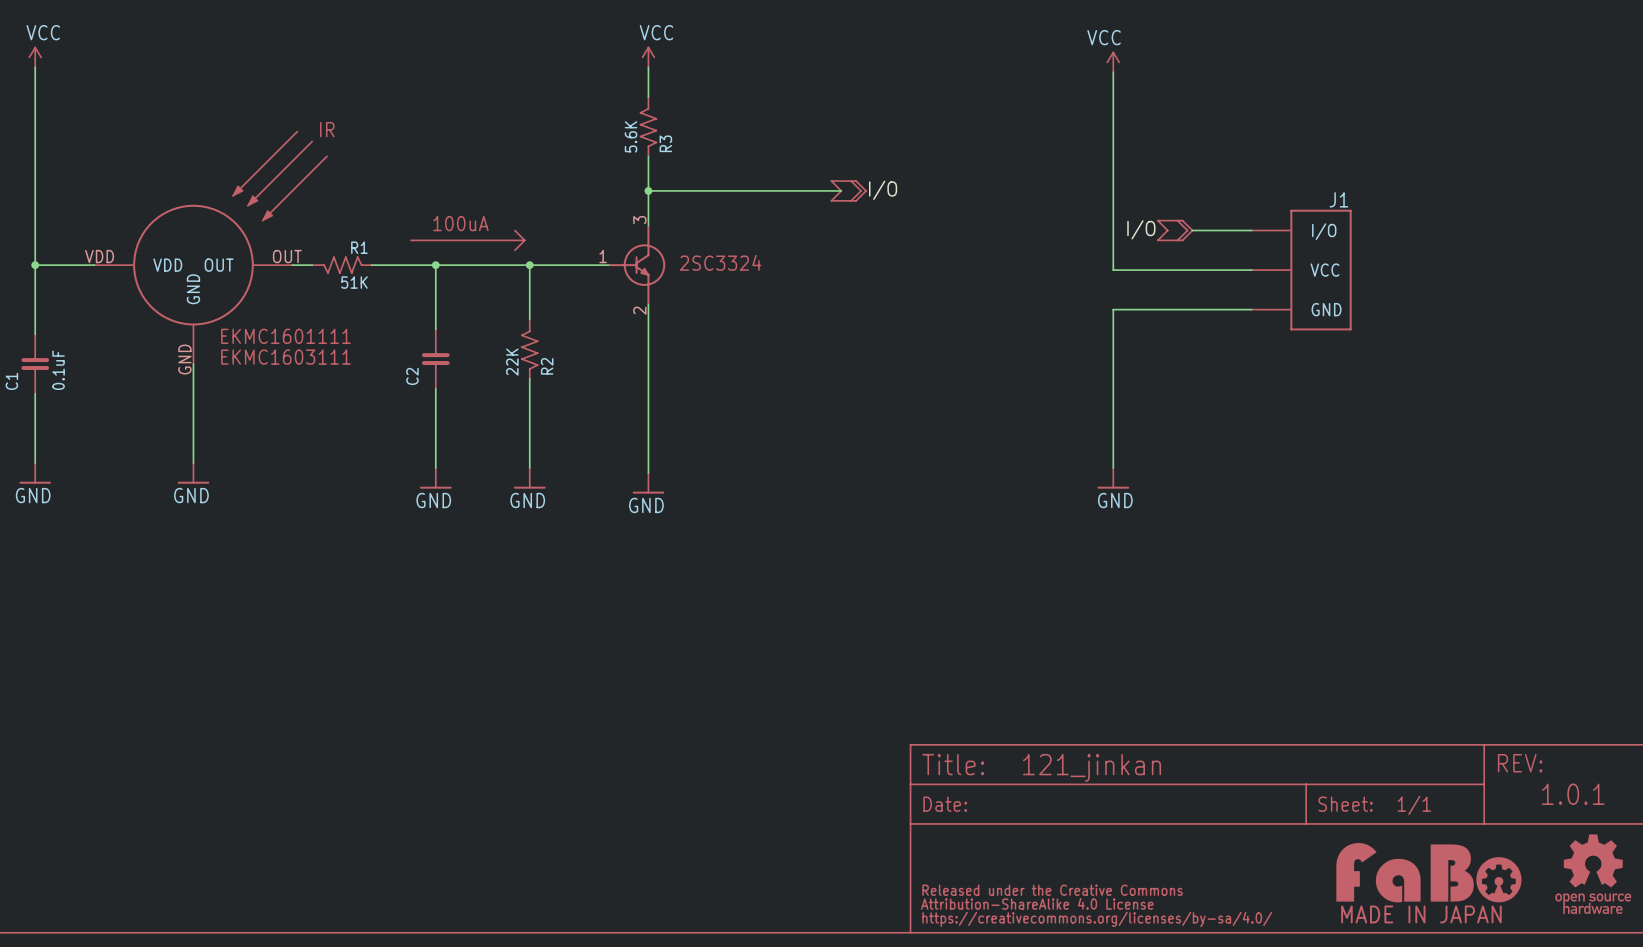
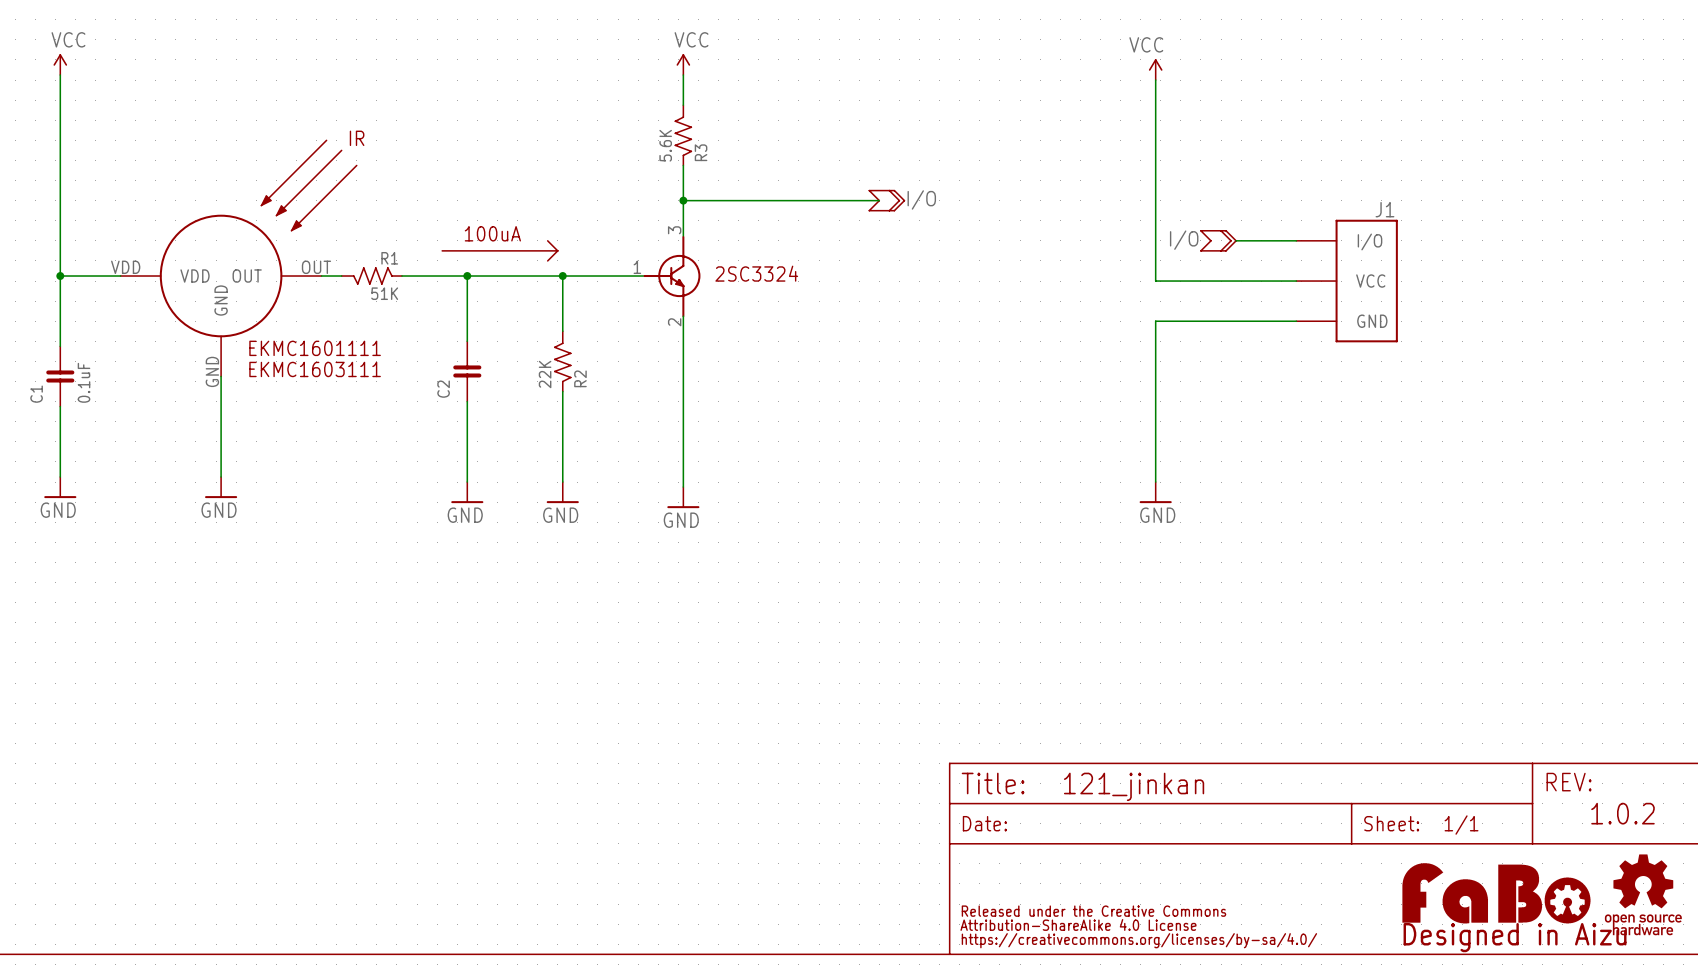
text: 1.0.1 (1573, 794) -> 1.0.2 (1622, 813)
part: (1428, 872) -> none
part: none -> (1496, 893)

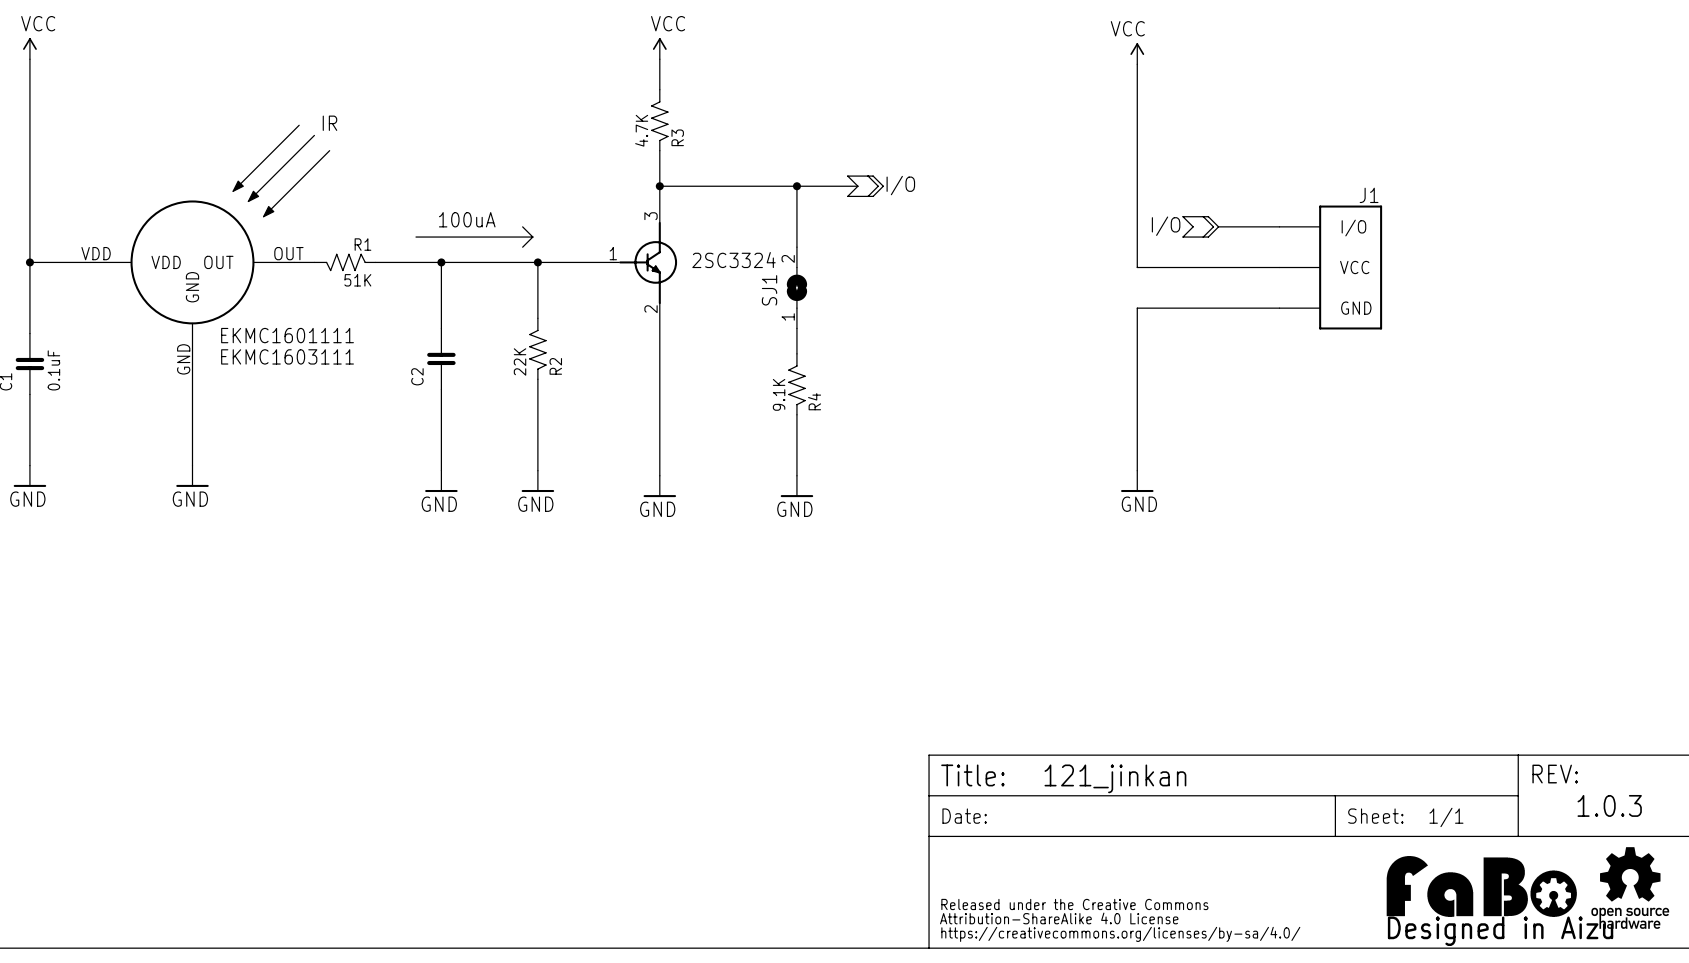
R3 value: 5.6K (665, 145) -> 4.7K (641, 130)
wire: none -> (796, 186) (796, 247)
junction: none -> (796, 186)
SJ1: none -> (796, 287)
wire: none -> (796, 328) (796, 353)
R4: none -> 9.1K (796, 384)
wire: none -> (796, 414) (796, 475)
power symbol: none -> GND (796, 486)
text: 1.0.2 (1622, 813) -> 1.0.3 (1609, 805)

